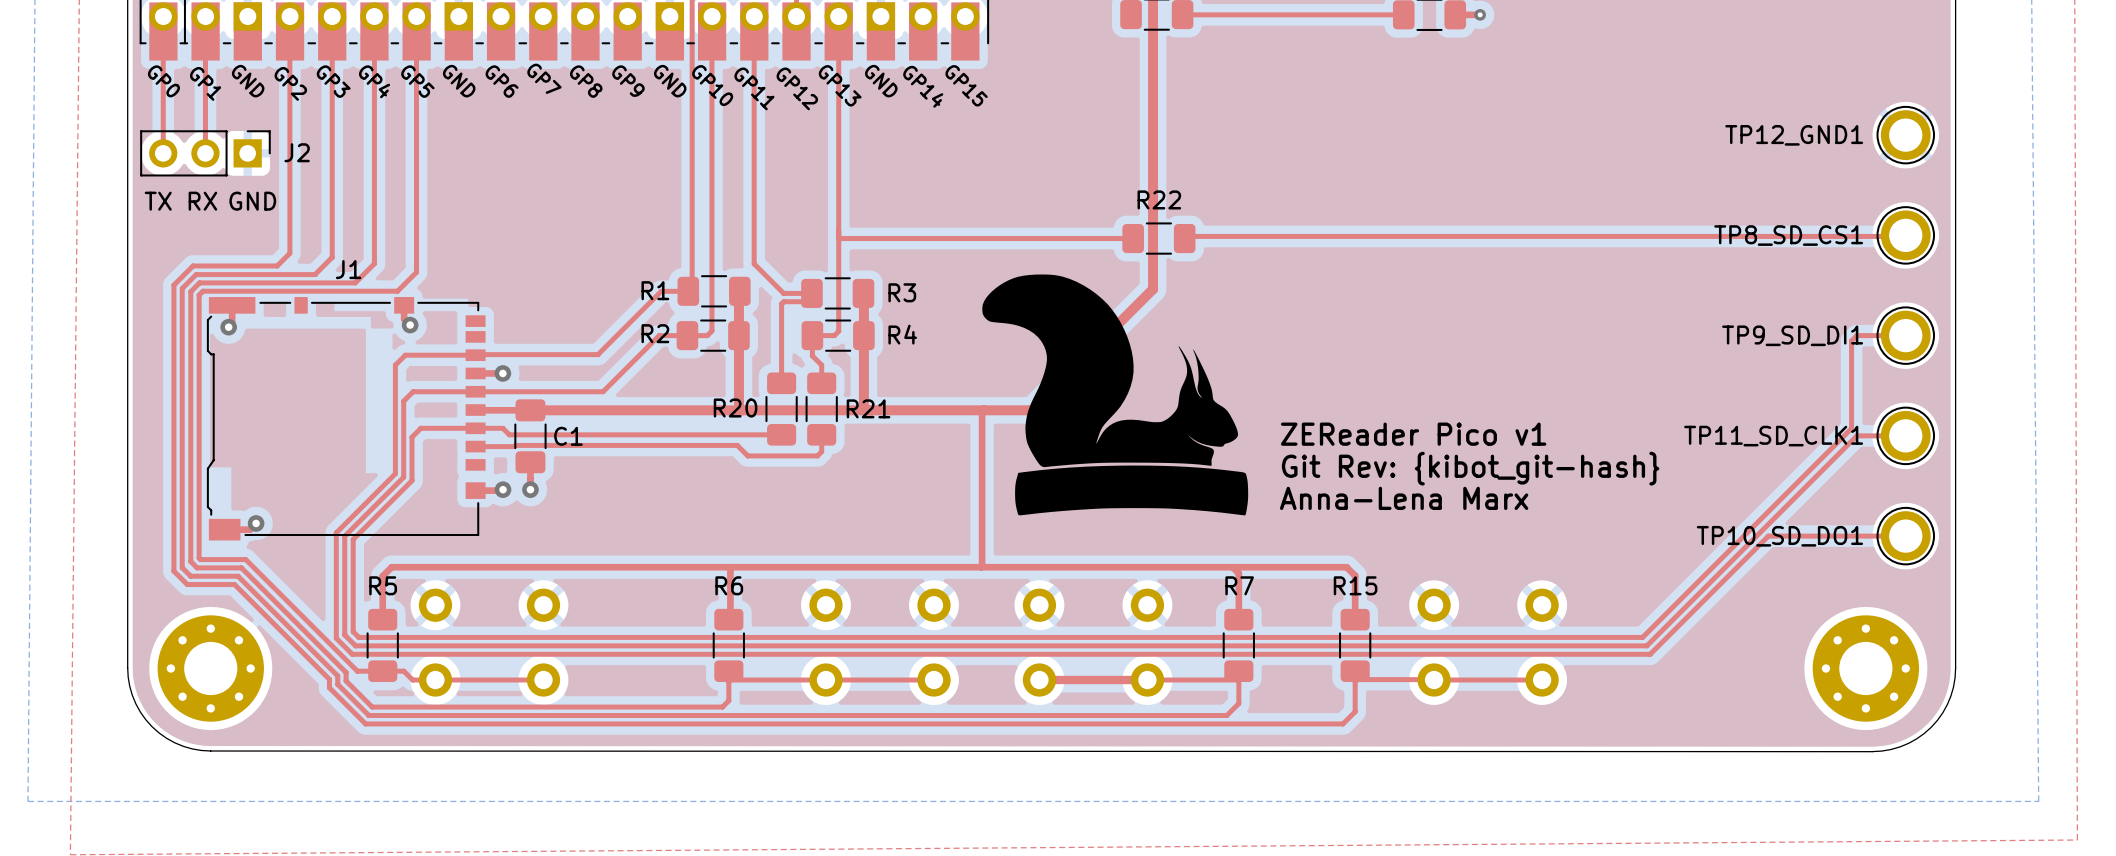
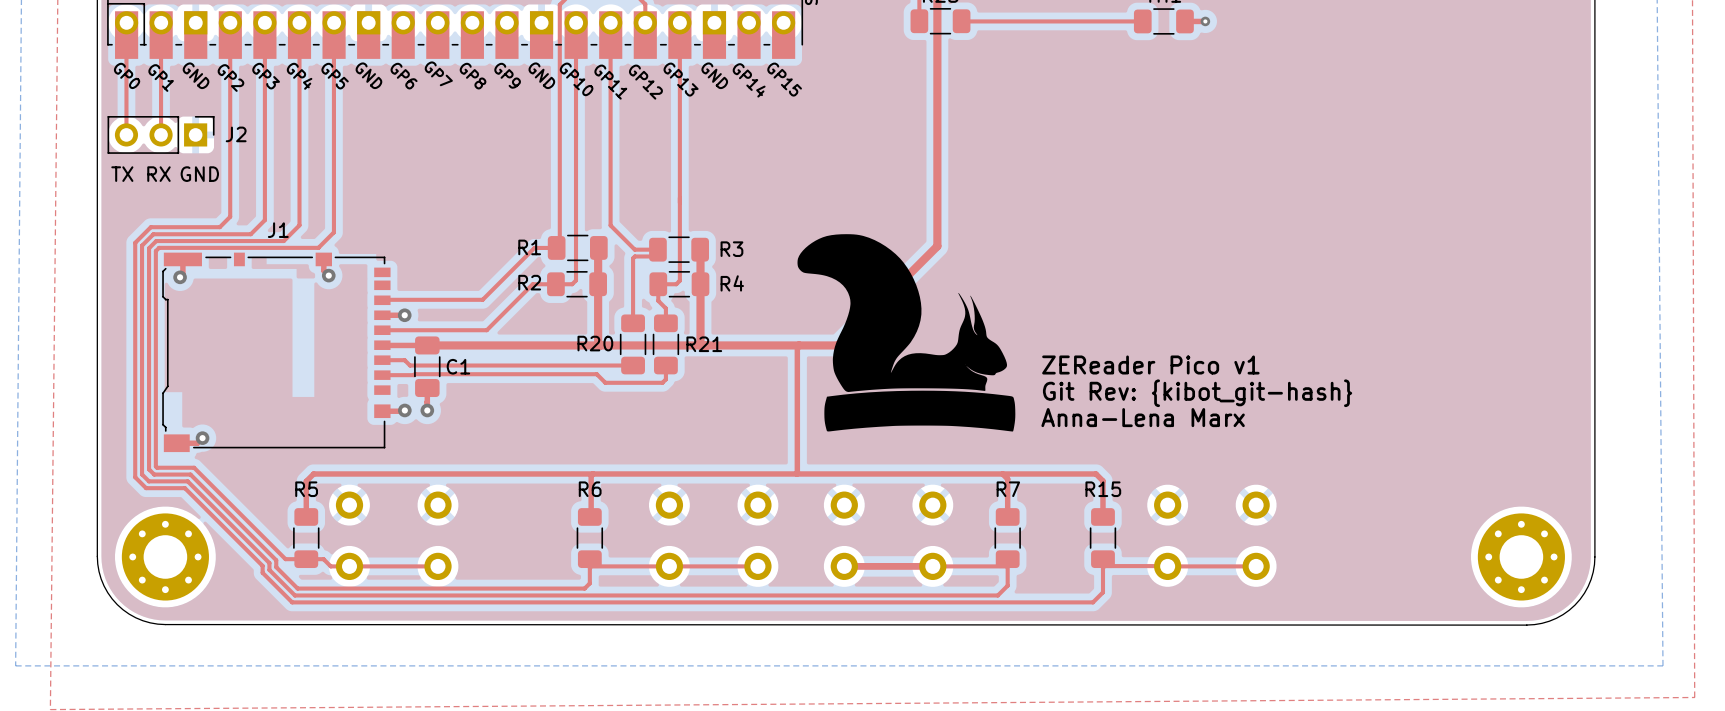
TP12_GND1: (1905, 135) -> none
TP8_SD_CS1: (1905, 235) -> none
top track: (1186, 236) (1906, 236) -> none
top track: (838, 238) (1133, 238) -> none
R22: (1158, 238) -> none
top track: (1905, 335) (1856, 335) (1851, 340) (1851, 428) (1642, 637) (358, 637) (353, 631) (353, 539) (412, 480) (412, 437) (420, 428) (475, 428) -> none
TP9_SD_DI1: (1905, 335) -> none
top track: (475, 355) (405, 355) (395, 365) (395, 473) (336, 532) (336, 638) (352, 654) (1650, 654) (1768, 536) (1906, 536) -> none
top track: (475, 391) (413, 391) (403, 401) (403, 477) (344, 536) (344, 635) (355, 645) (1646, 645) (1856, 435) (1905, 435) -> none
TP11_SD_CLK1: (1905, 435) -> none
TP10_SD_DO1: (1905, 536) -> none

